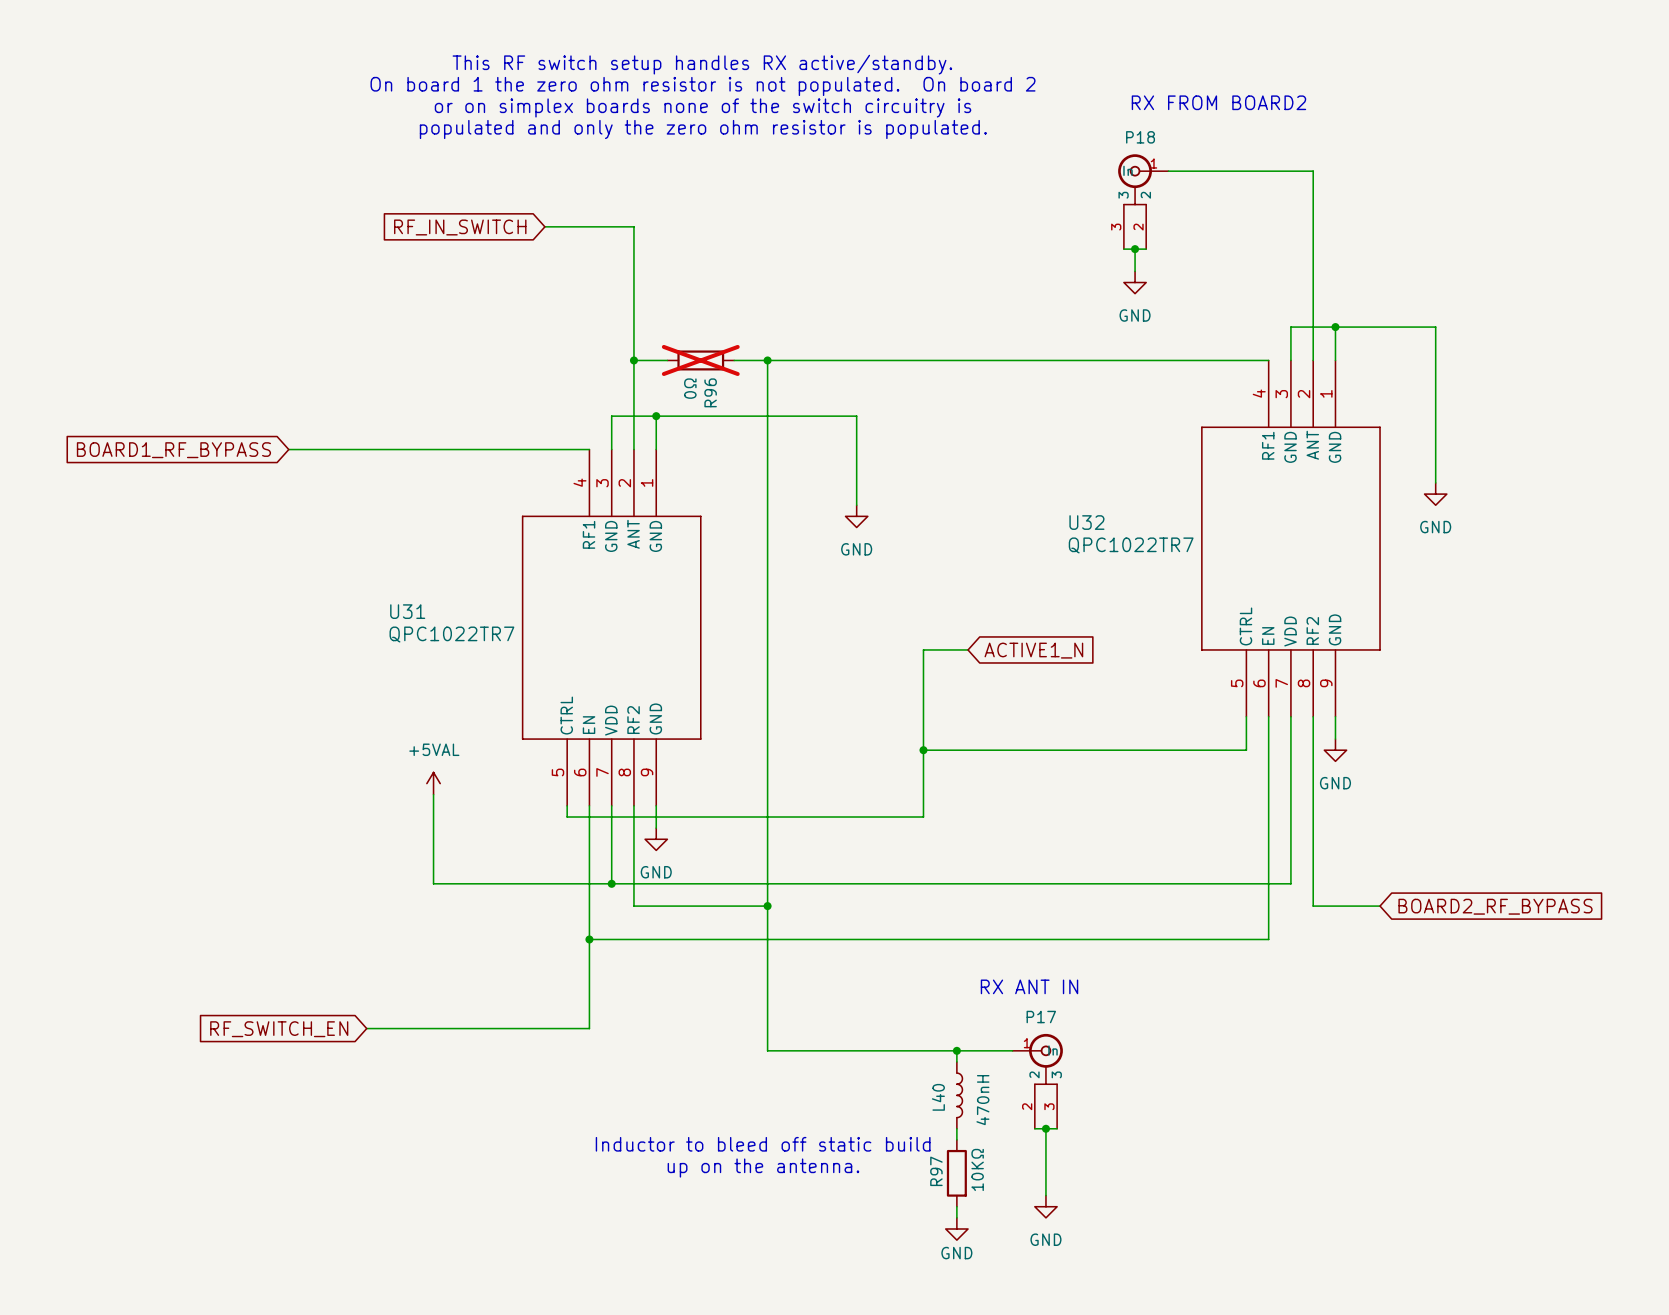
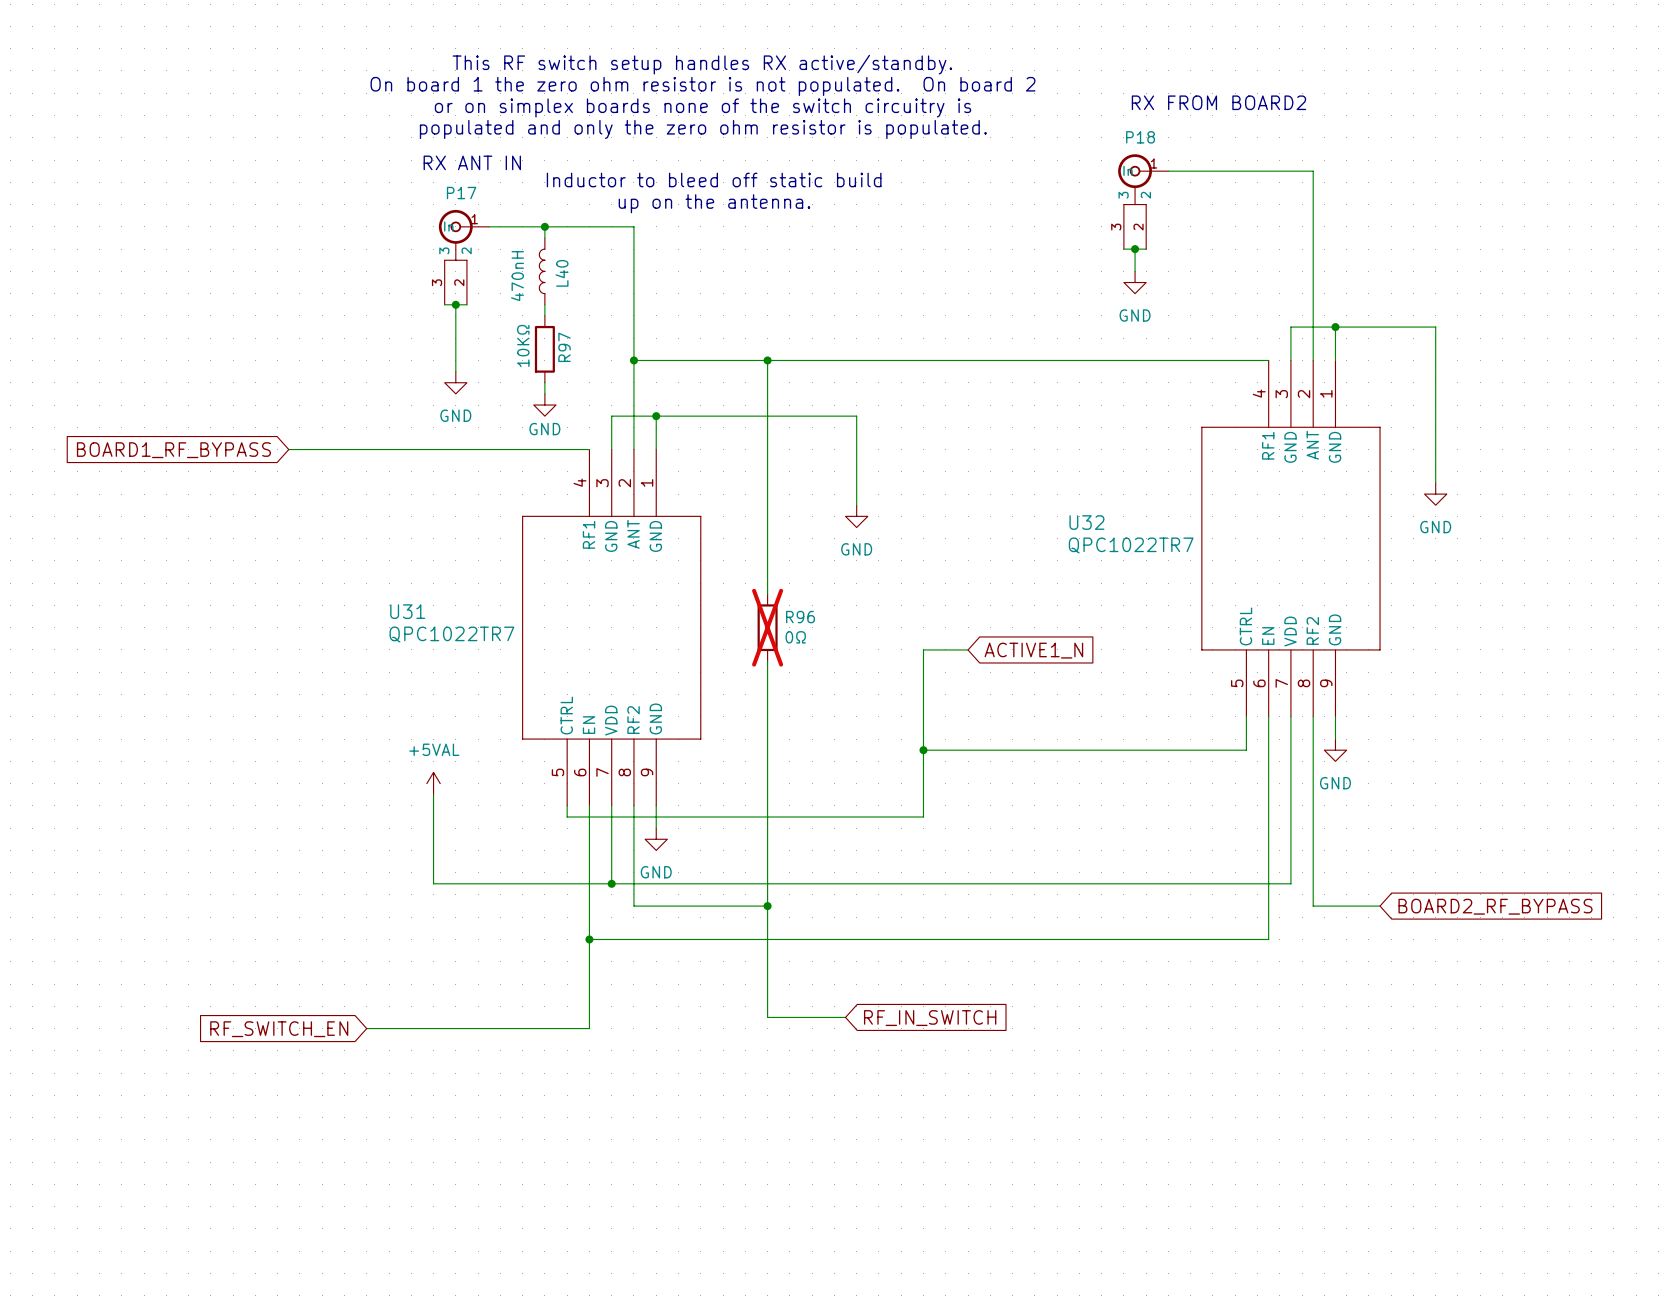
text: none -> RX ANT IN (472, 162)
text: none -> Inductor to bleed off static build (714, 179)
text: none -> up on the antenna. (714, 203)
wire: none -> (489, 226) (544, 226) (544, 237)
junction: none -> (544, 226)
global label: RF_IN_SWITCH (460, 227) -> none
wire: none -> (444, 304) (466, 304)
wire: none -> (455, 304) (455, 371)
junction: none -> (455, 304)
wire: none -> (544, 304) (544, 315)
R96 rotation: 0° (700, 360) -> 90° clockwise (767, 627)
R96 position: (700, 360) -> (767, 627)
power symbol: none -> GND (455, 382)
wire: none -> (544, 382) (544, 393)
R96 value position: 0Ω (690, 388) -> 0Ω (795, 637)
R96 name position: R96 (710, 392) -> R96 (800, 617)
power symbol: none -> GND (544, 405)
text: RX ANT IN (1029, 986) -> none
wire: (767, 1017) (767, 1050) (1012, 1050) -> (767, 1017) (845, 1017)
global label: none -> RF_IN_SWITCH (930, 1018)
wire: (956, 1050) (956, 1061) -> none
junction: (956, 1050) -> none
P17 flip: as is (1045, 1059) -> left-right (455, 235)
P17 position: (1037, 1081) -> (464, 257)
L40 rotation: 0° (959, 1095) -> 180° (542, 271)
L40 position: (959, 1095) -> (542, 271)
wire: (956, 1128) (956, 1139) -> none
wire: (1034, 1128) (1057, 1128) -> none
wire: (1045, 1128) (1045, 1195) -> none
junction: (1045, 1128) -> none
text: Inductor to bleed off static build (763, 1144) -> none
text: up on the antenna. (763, 1168) -> none
R97 value position: 10KΩ (977, 1169) -> 10KΩ (523, 345)
R97 name position: R97 (936, 1171) -> R97 (564, 347)
R97 position: (956, 1173) -> (544, 349)
wire: (956, 1206) (956, 1217) -> none
power symbol: GND (1045, 1206) -> none
power symbol: GND (956, 1228) -> none

